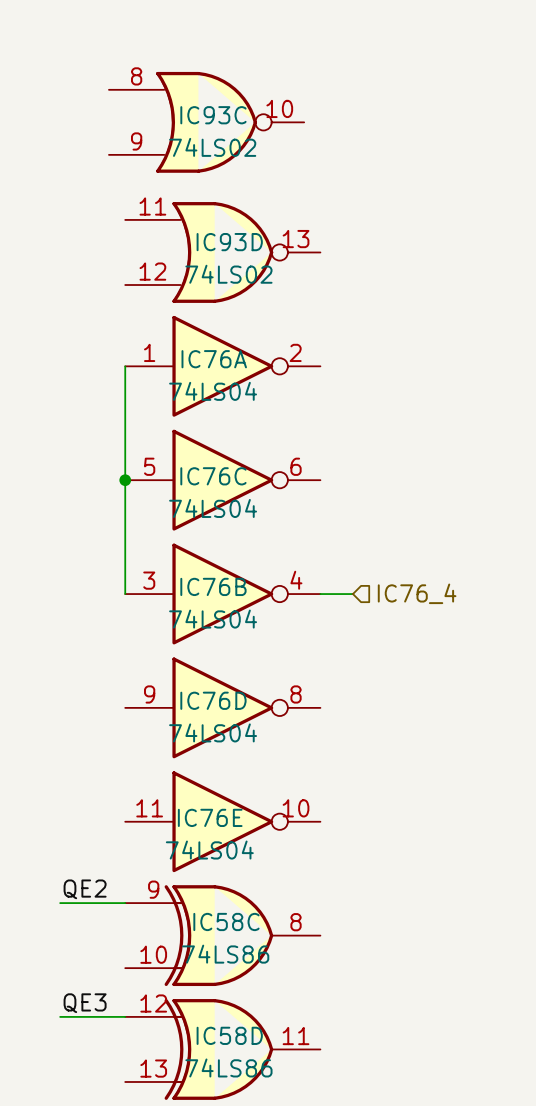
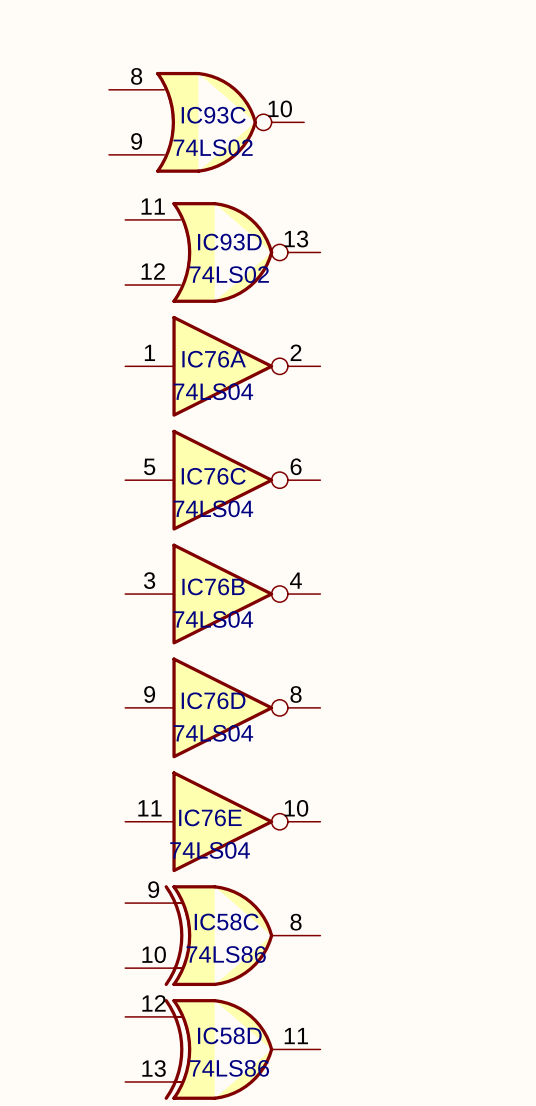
wire: (125, 366) (125, 594) -> none
junction: (125, 480) -> none
hierarchical label: IC76_4 (417, 593) -> none
wire: (320, 594) (352, 594) -> none
label: QE2 (85, 889) -> none
wire: (60, 903) (125, 903) -> none
label: QE3 (85, 1003) -> none
wire: (60, 1016) (125, 1016) -> none

